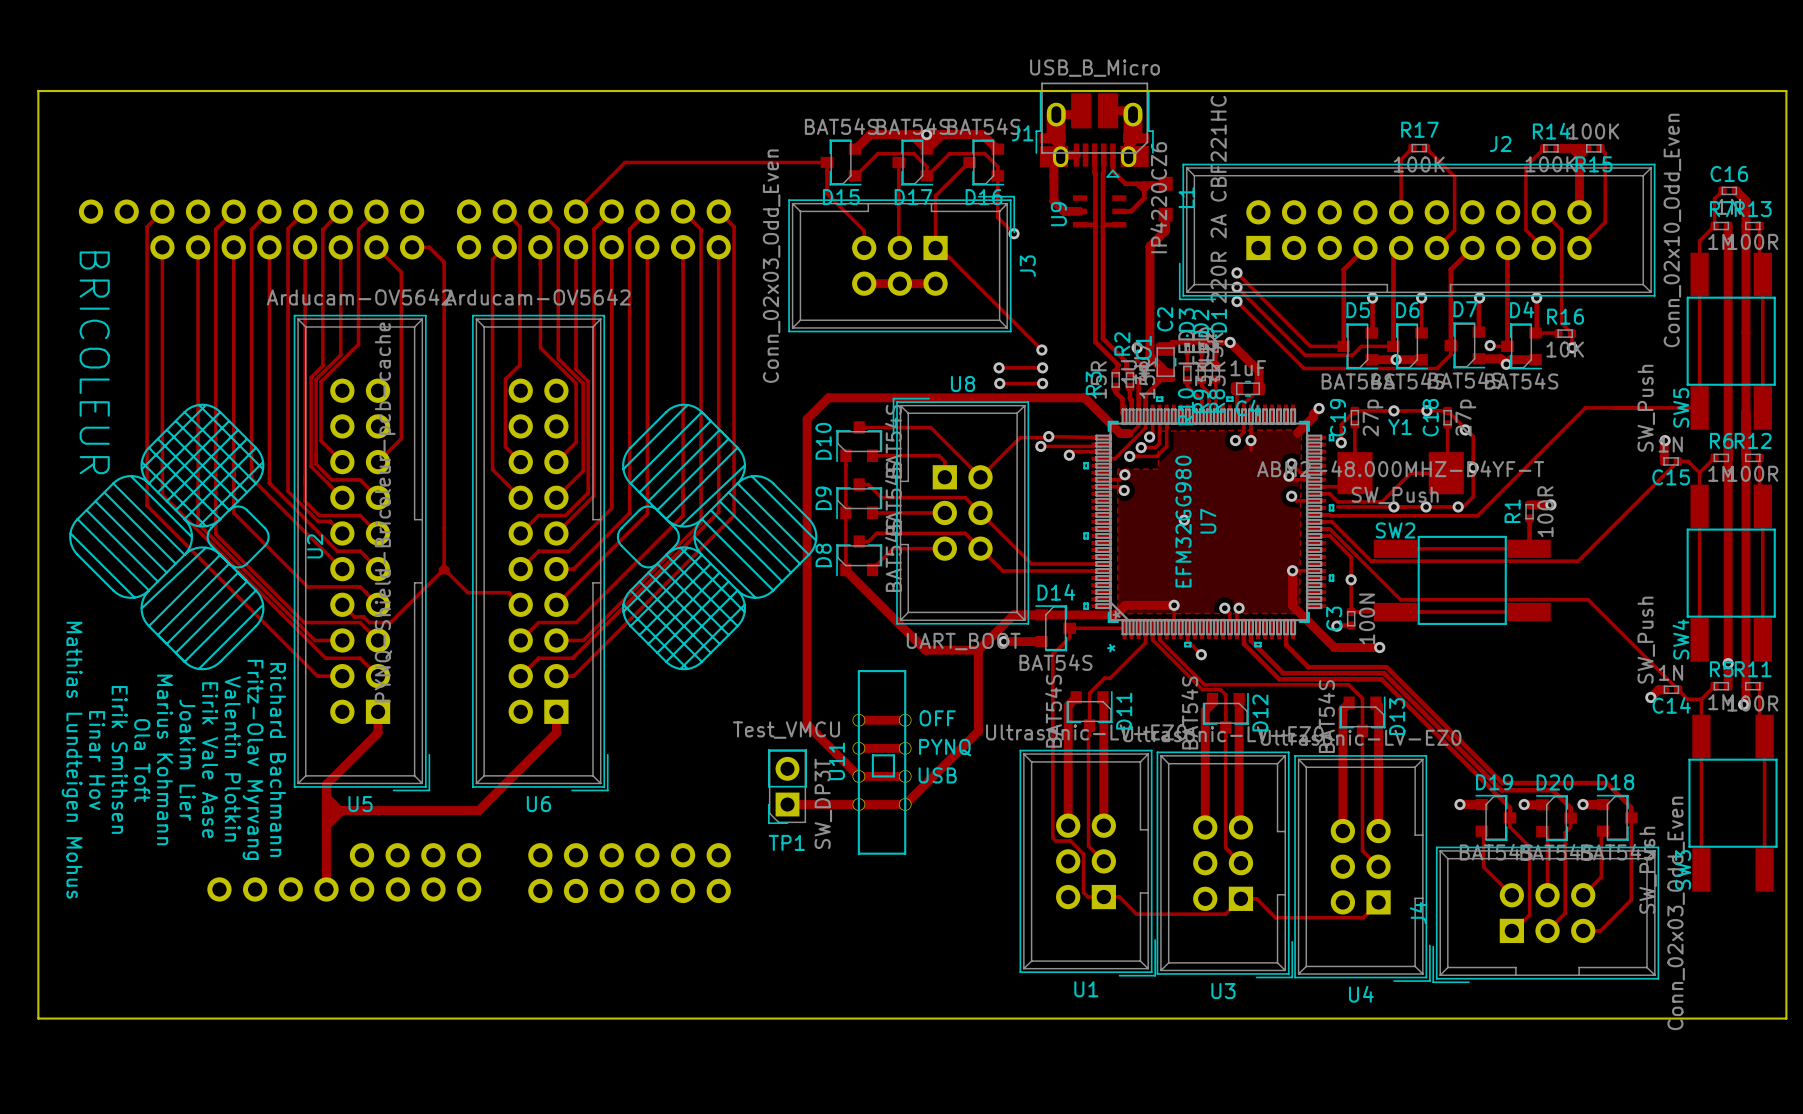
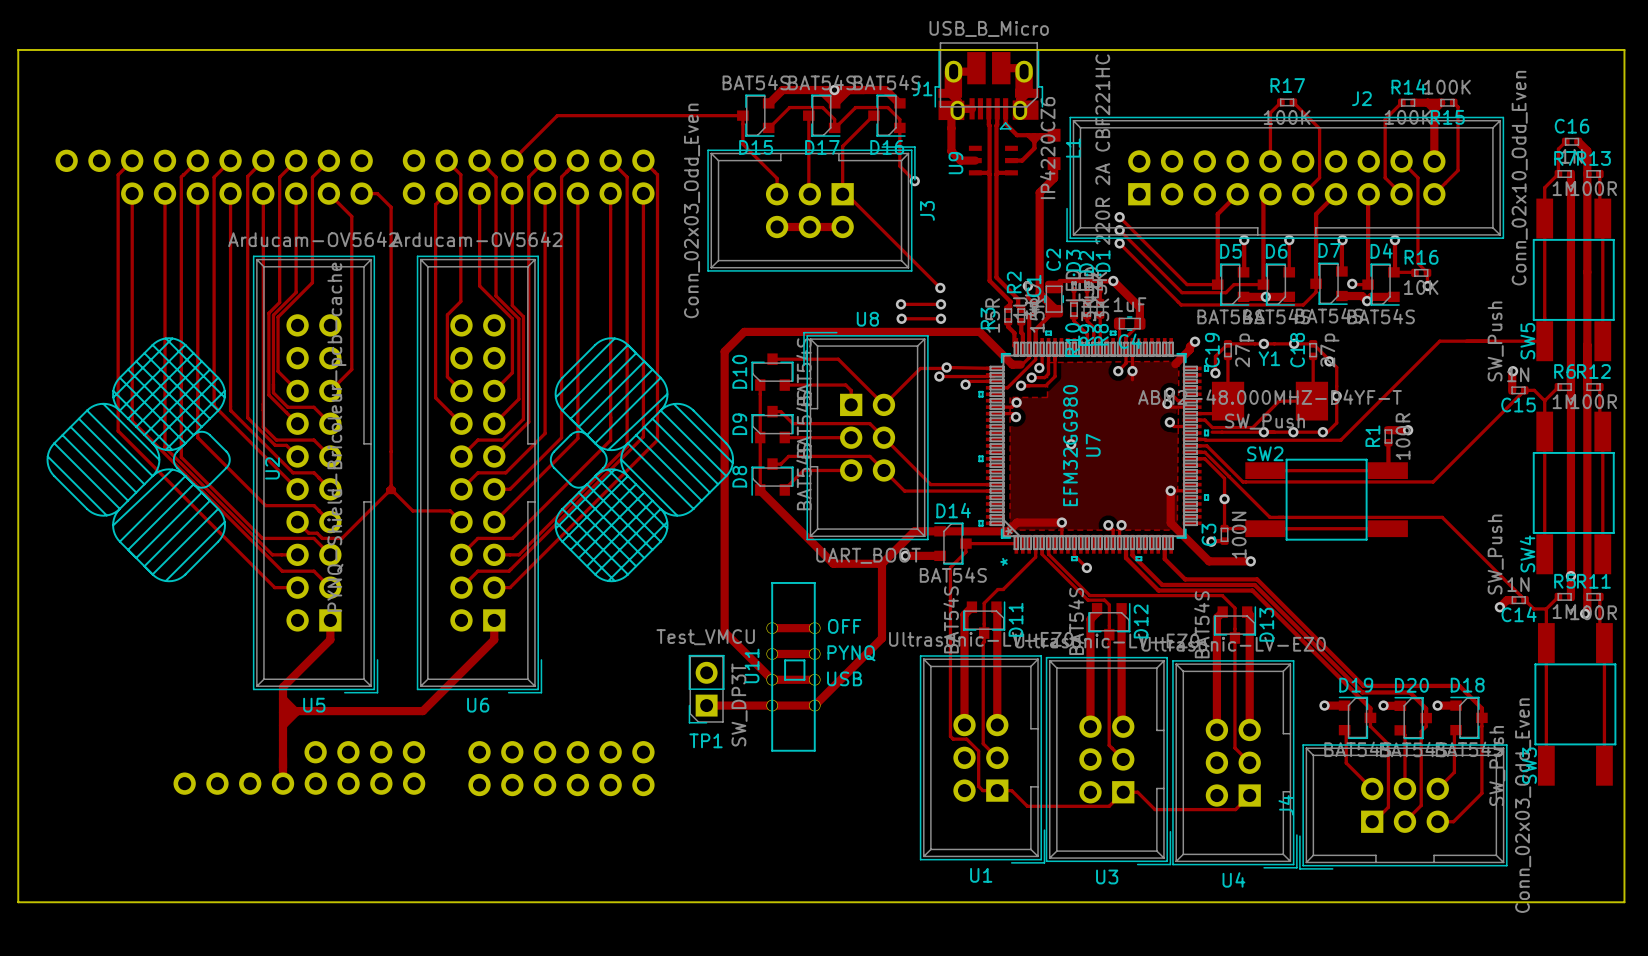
text: BRICOLEUR (94, 362) -> none
text: Valentin Plotkin (232, 758) -> none
text: Eirik Smithsen (119, 759) -> none
text: Marius Kohmann (164, 759) -> none
text: Fritz-Olav Myrvang (253, 759) -> none
text: Richard Bachmann (277, 759) -> none
text: Mathias Lundteigen Mohus (72, 760) -> none
text: Einar Hov (97, 760) -> none
text: Ola Toft (142, 760) -> none
text: Joakim Lier (187, 760) -> none
text: Eirik Vale Aase (210, 760) -> none

